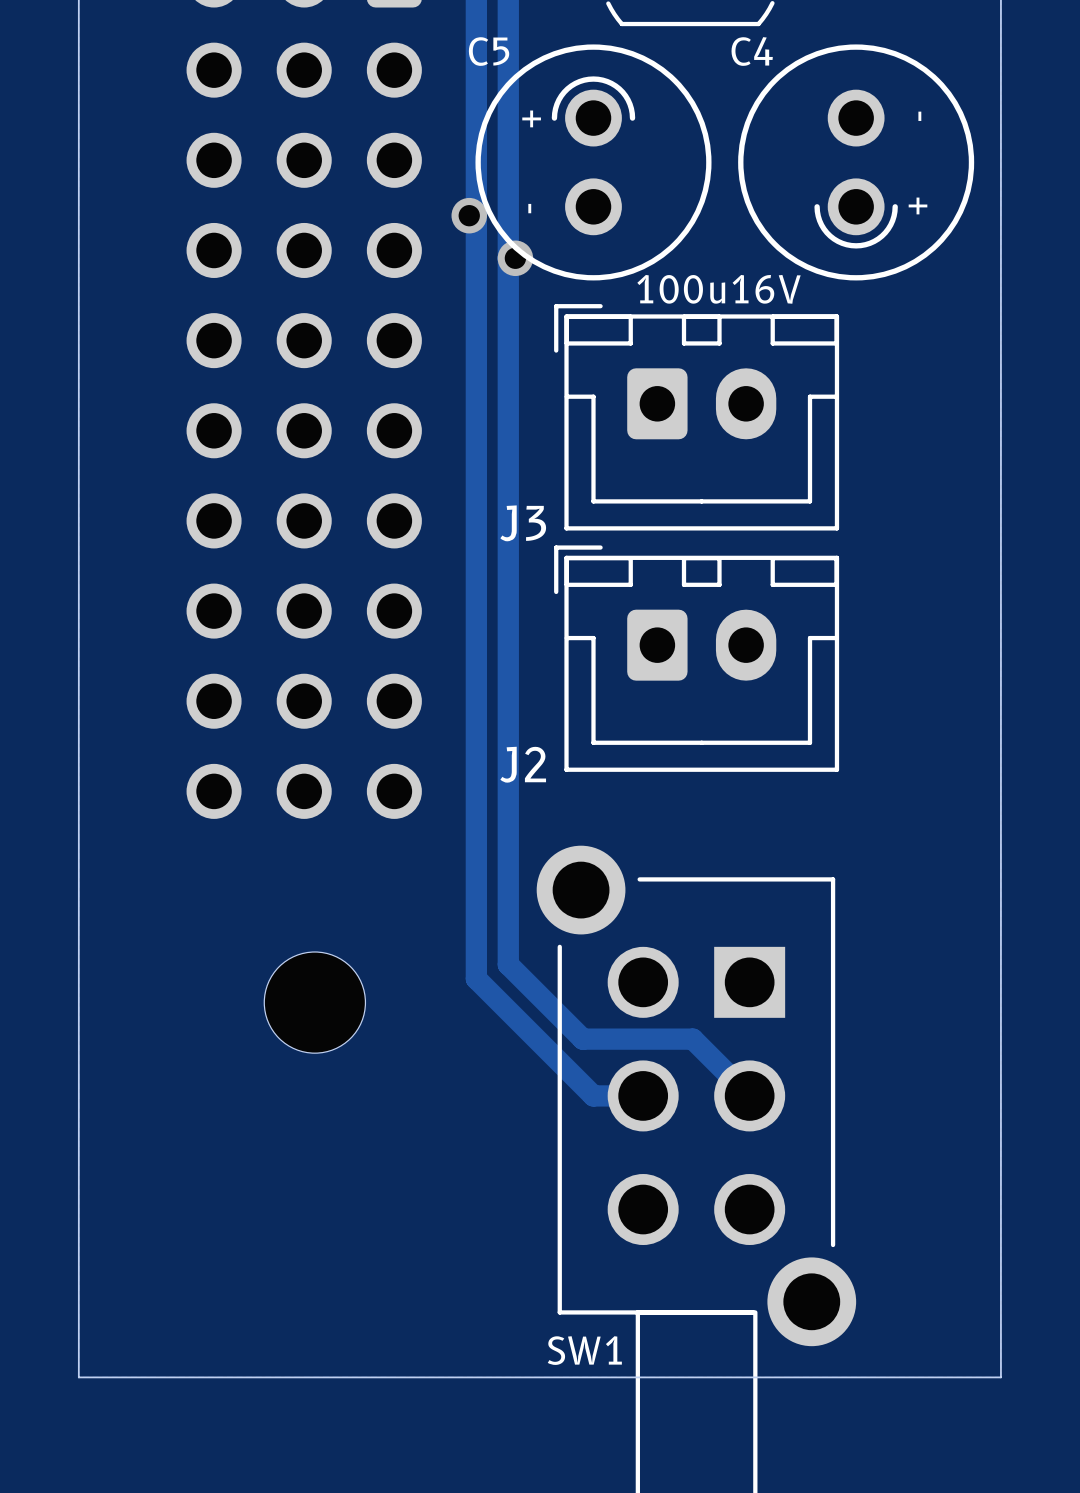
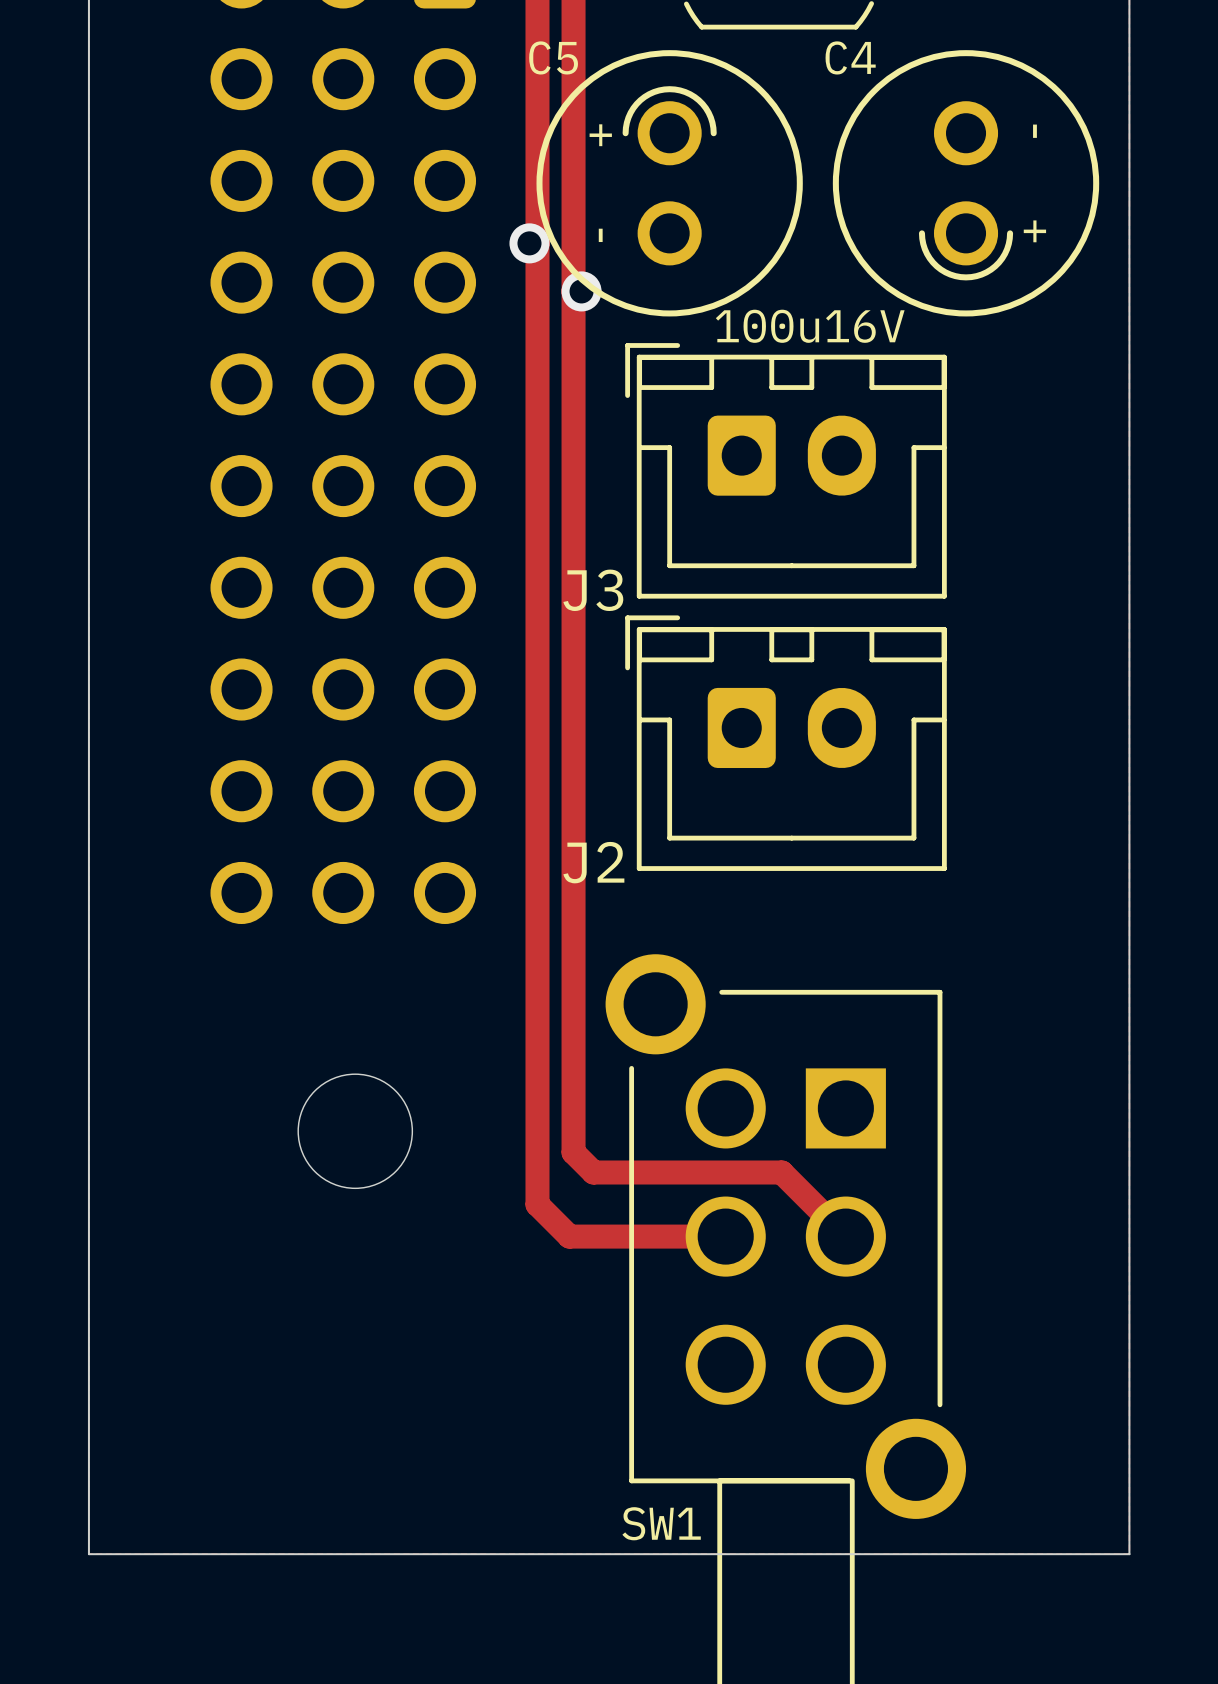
track: (508, 964) (582, 1039) -> (573, 1088) (573, 1152) (593, 1172) (657, 1172)
track: (476, 978) (593, 1095) -> (537, 1104) (537, 1204) (569, 1236) (669, 1236)

